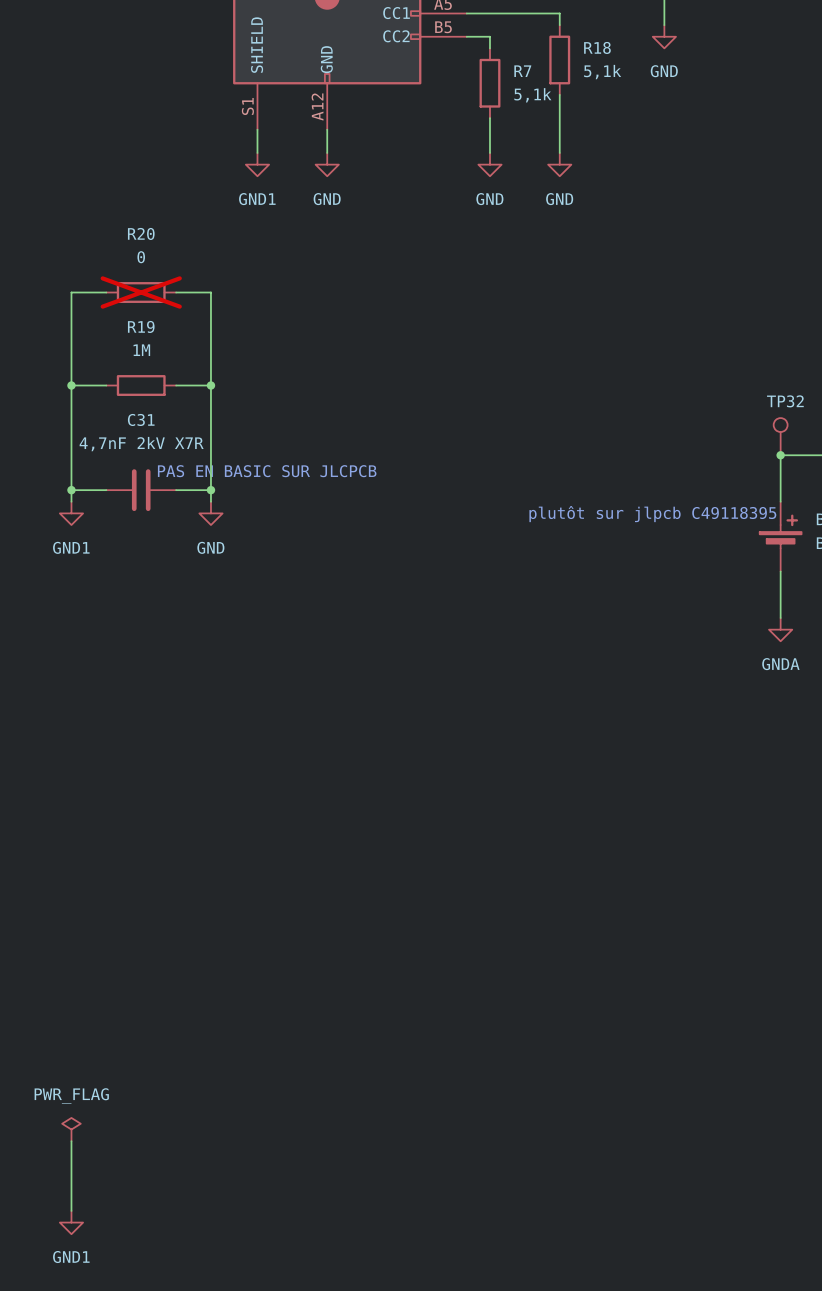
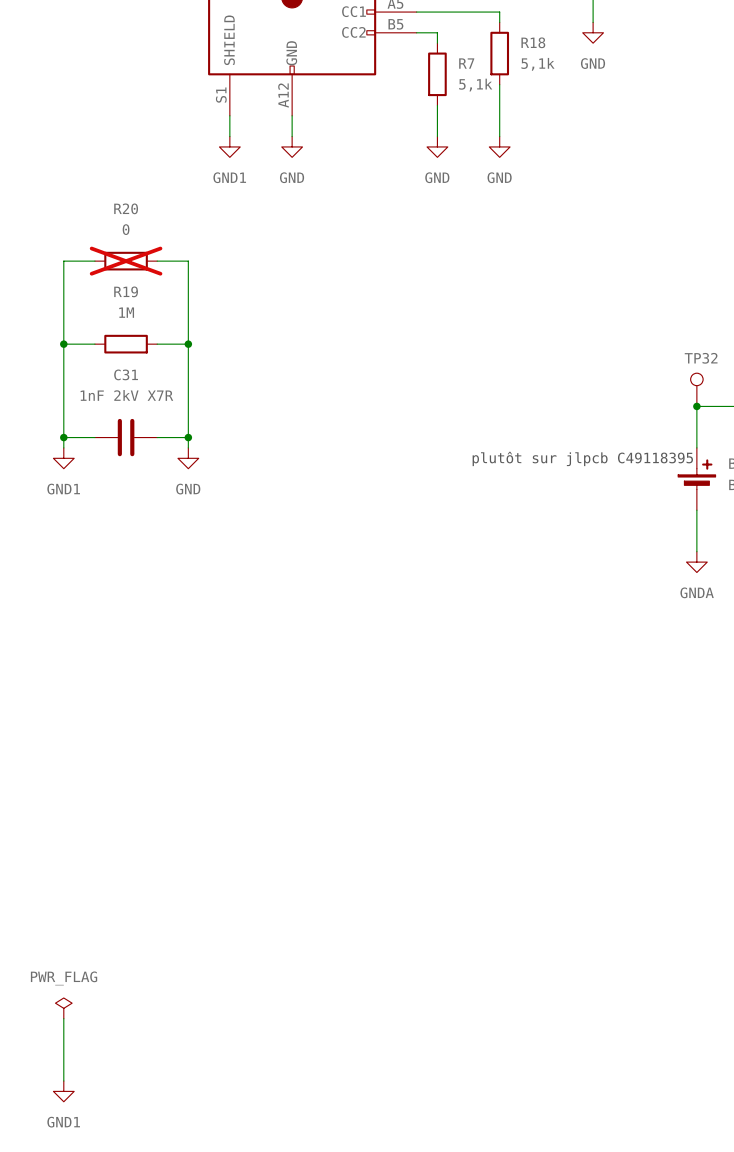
C31 value: 4,7nF 2kV X7R (141, 444) -> 1nF 2kV X7R (126, 395)
text: PAS EN BASIC SUR JLCPCB (267, 471) -> none

